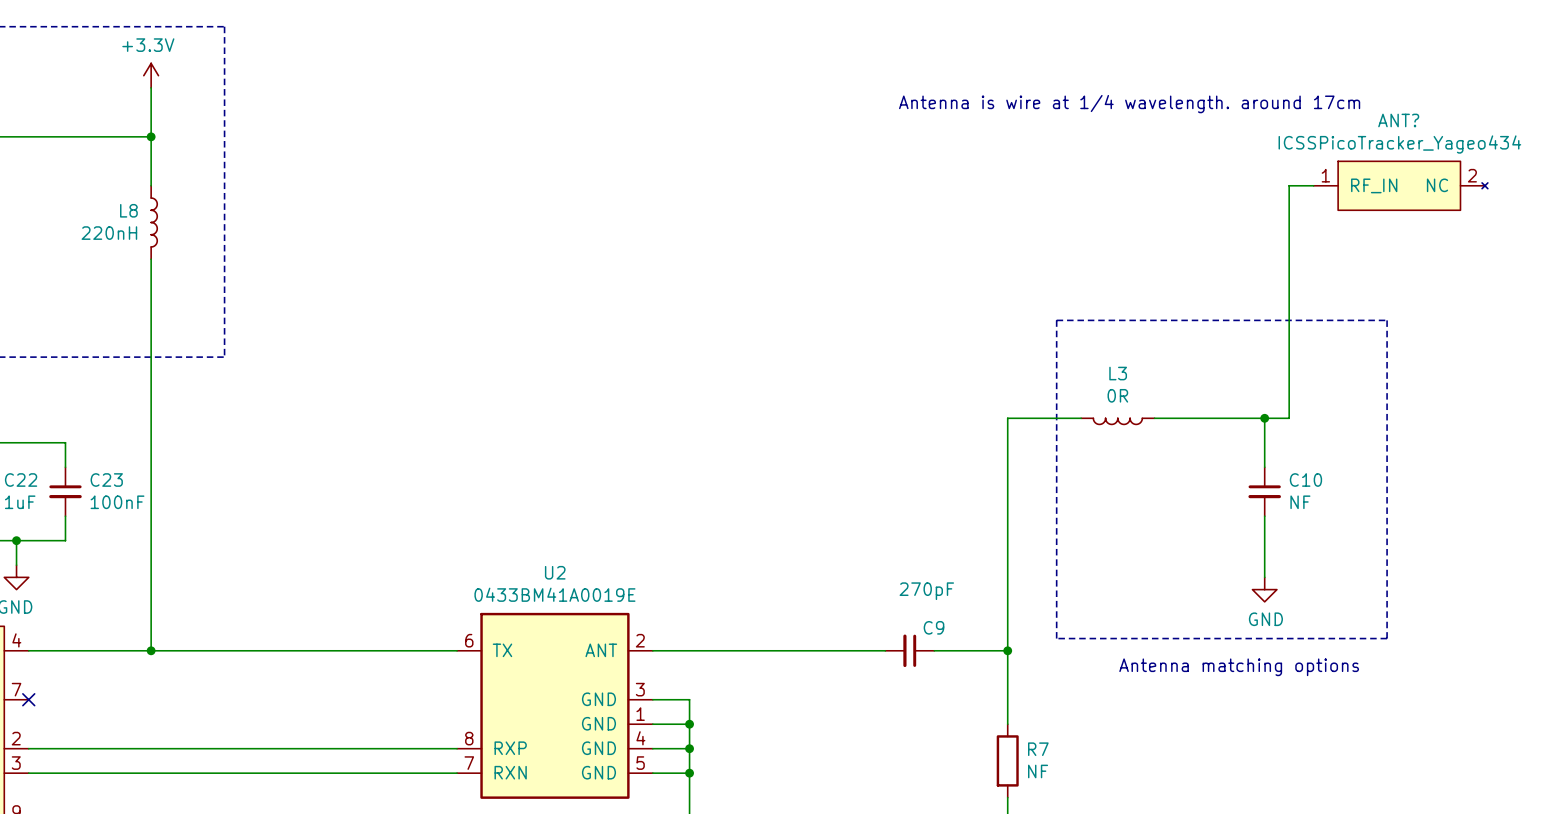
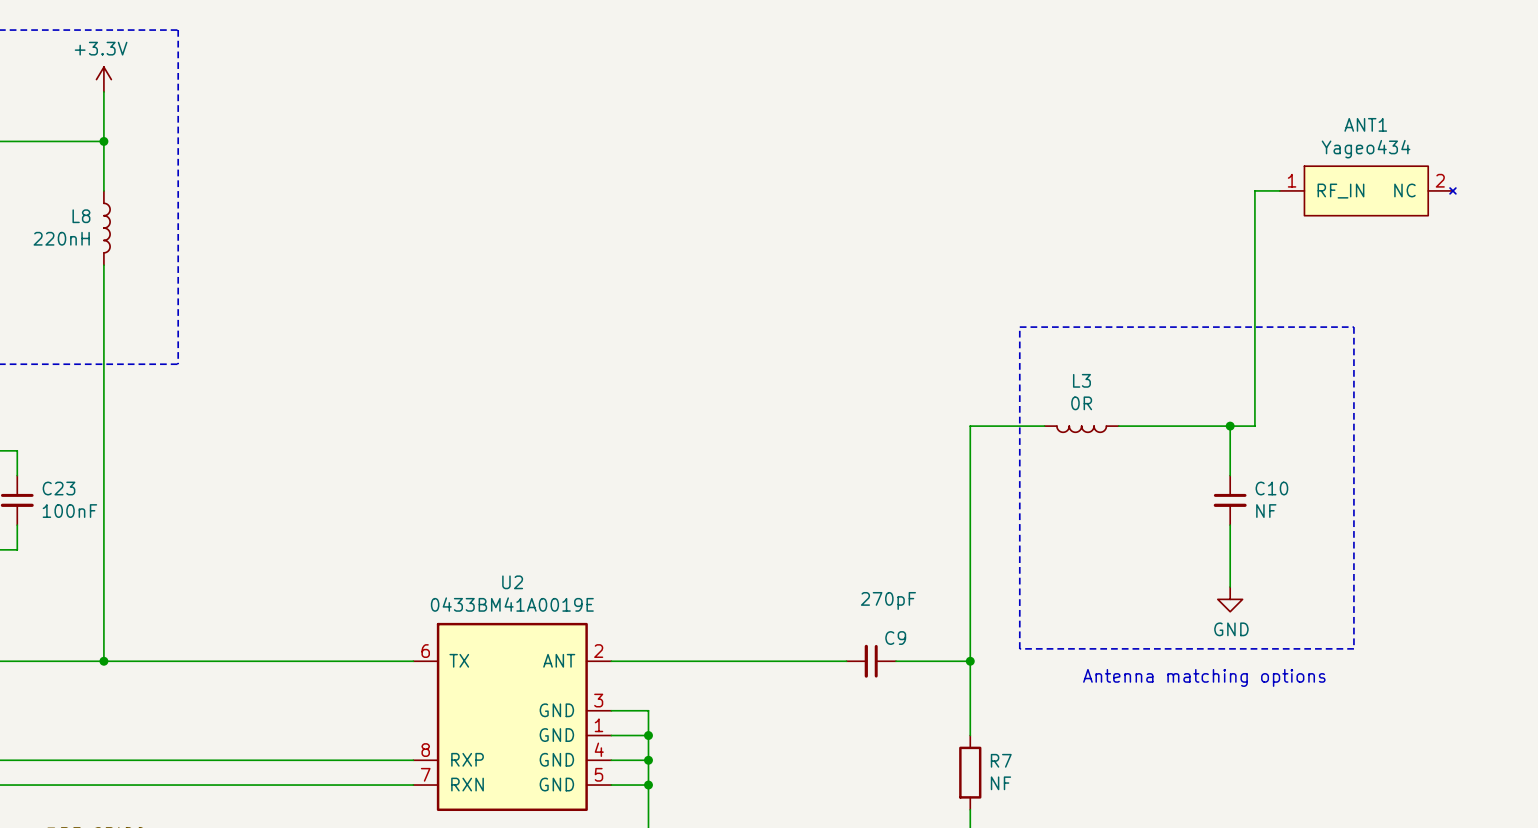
text: Antenna is wire at 1/4 wavelength. around 17cm (1129, 104) -> none
ANT? name: ANT? (1398, 120) -> ANT1 (1365, 124)
ANT? value: ICSSPicoTracker_Yageo434 (1399, 144) -> Yageo434 (1366, 149)

